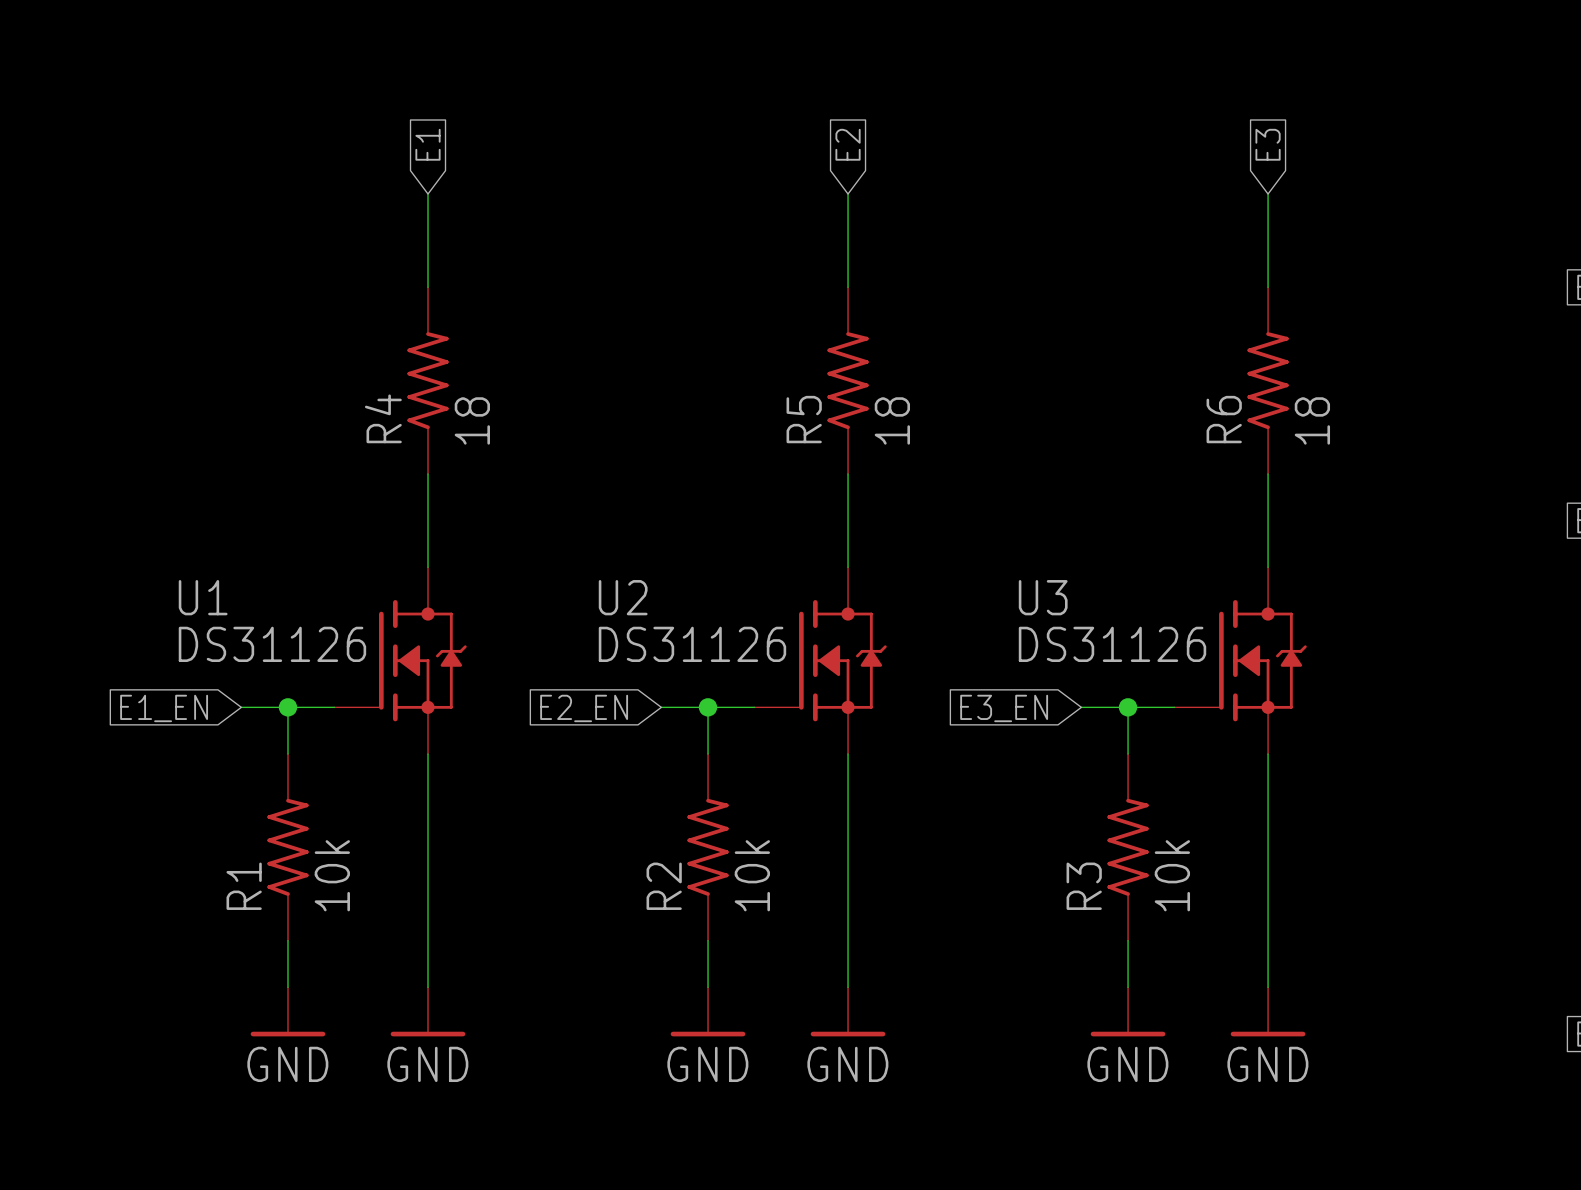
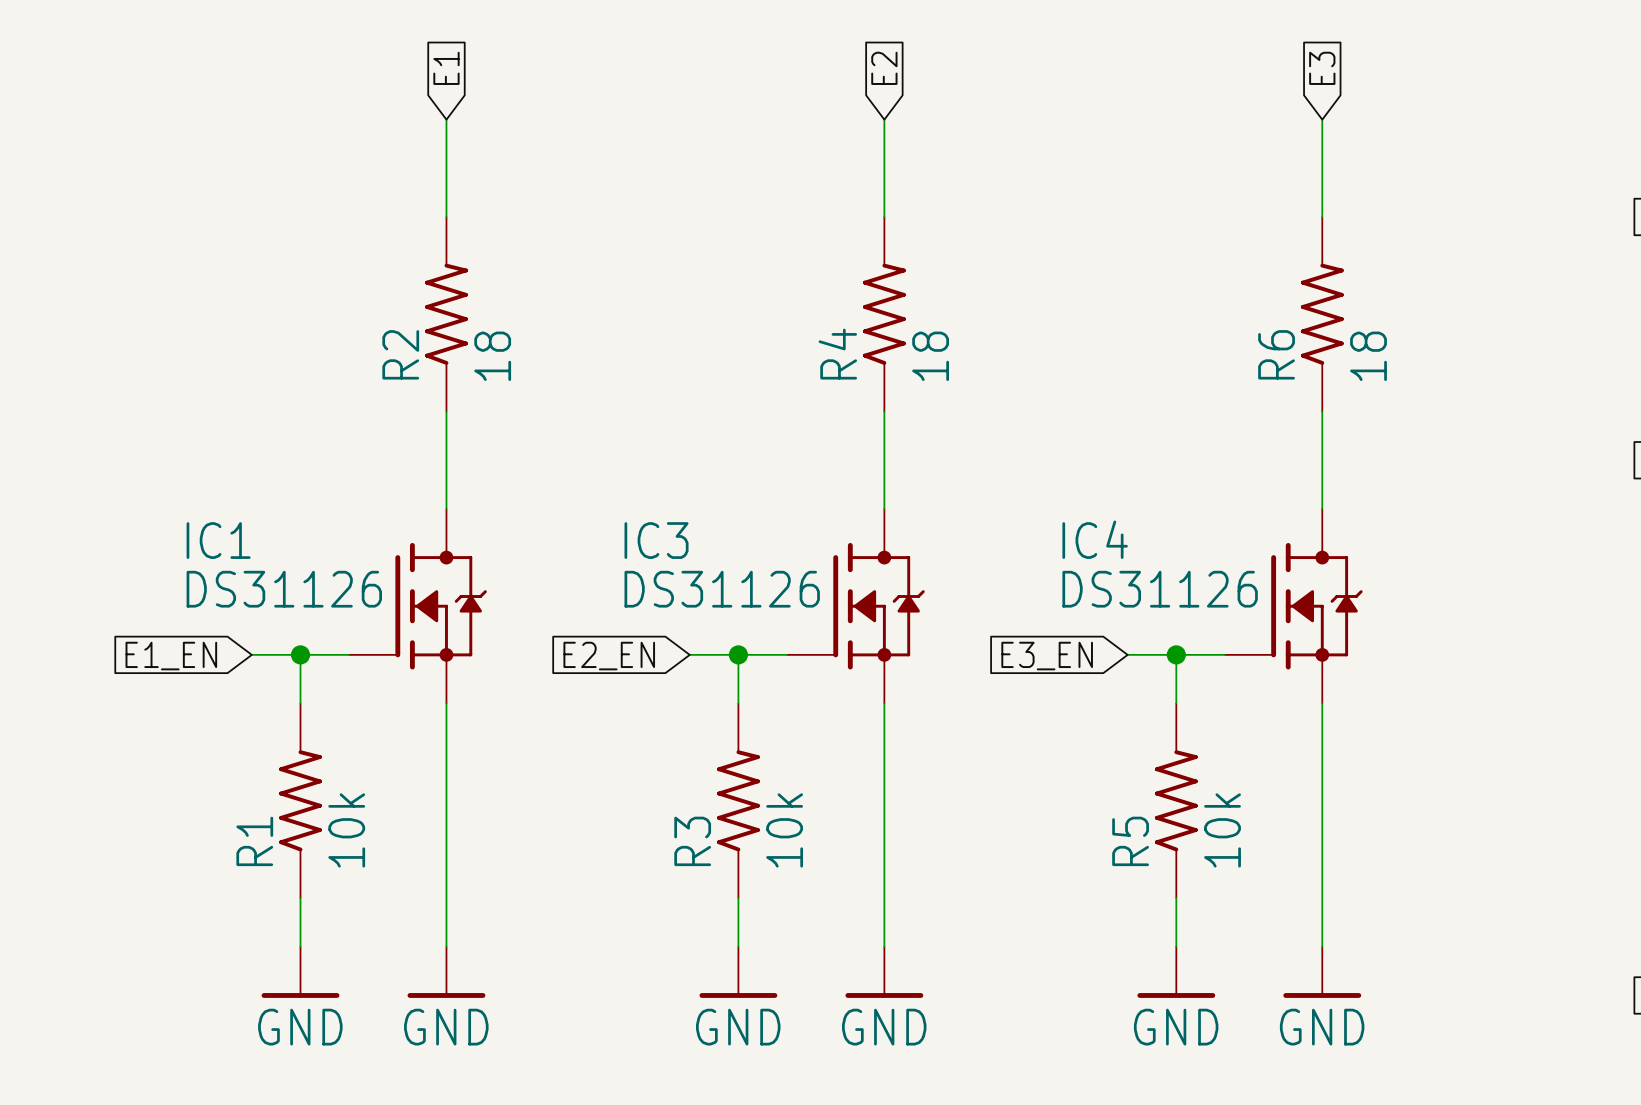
R4 name: R4 (383, 418) -> R2 (400, 354)
R5 name: R5 (804, 419) -> R4 (837, 354)
U1 name: U1 (203, 597) -> IC1 (218, 540)
U2 name: U2 (623, 597) -> IC3 (656, 540)
U3 name: U3 (1043, 597) -> IC4 (1095, 539)
R2 name: R2 (664, 886) -> R3 (692, 841)
R3 name: R3 (1084, 886) -> R5 (1130, 841)

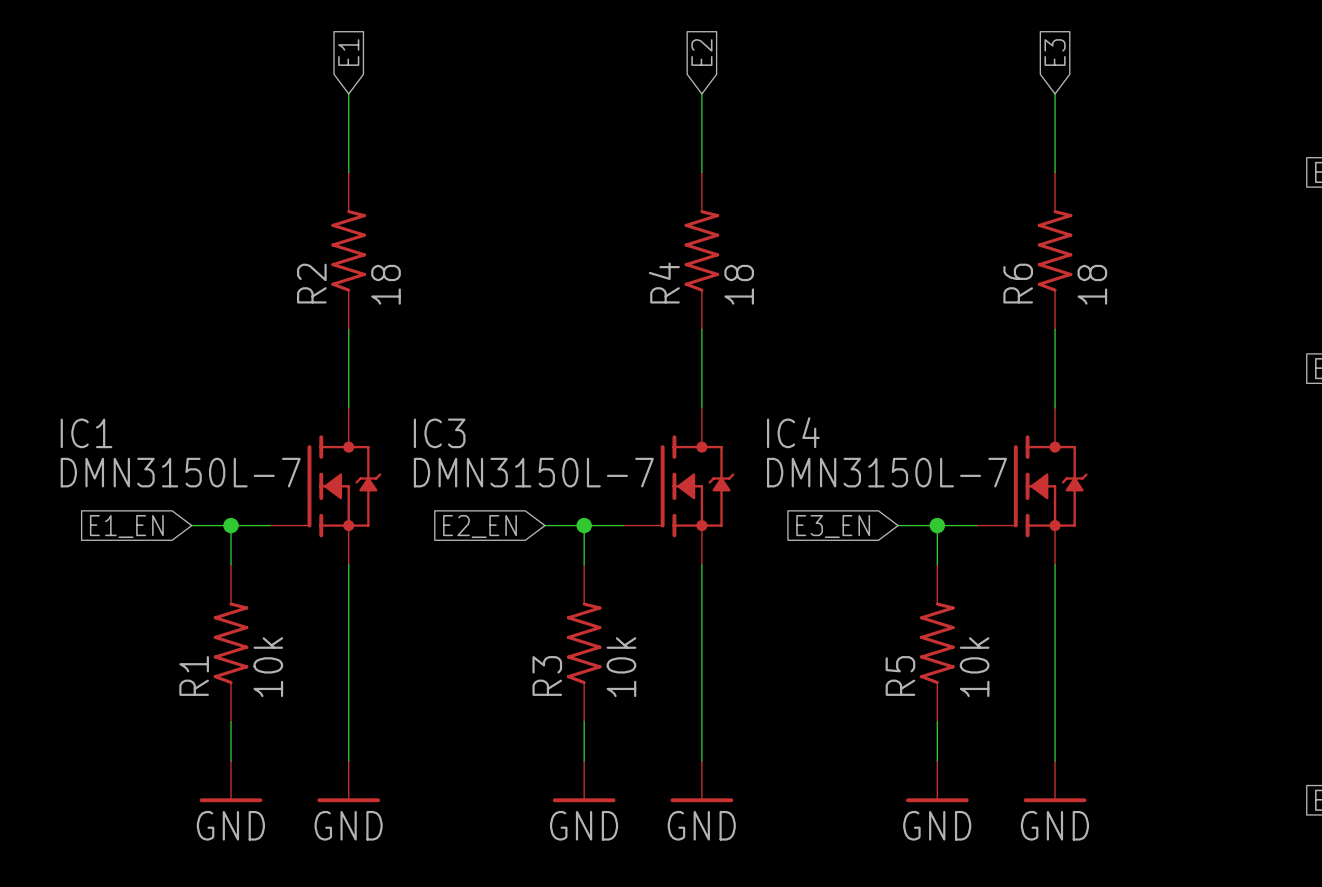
IC4 name position: IC4 (1095, 539) -> IC4 (793, 432)
IC1 name position: IC1 (218, 540) -> IC1 (86, 433)
IC3 name position: IC3 (656, 540) -> IC3 (439, 433)
IC1 value: DS31126 (284, 589) -> DMN3150L-7 (180, 472)
IC3 value: DS31126 (722, 589) -> DMN3150L-7 (533, 472)
IC4 value: DS31126 (1160, 589) -> DMN3150L-7 (886, 472)

